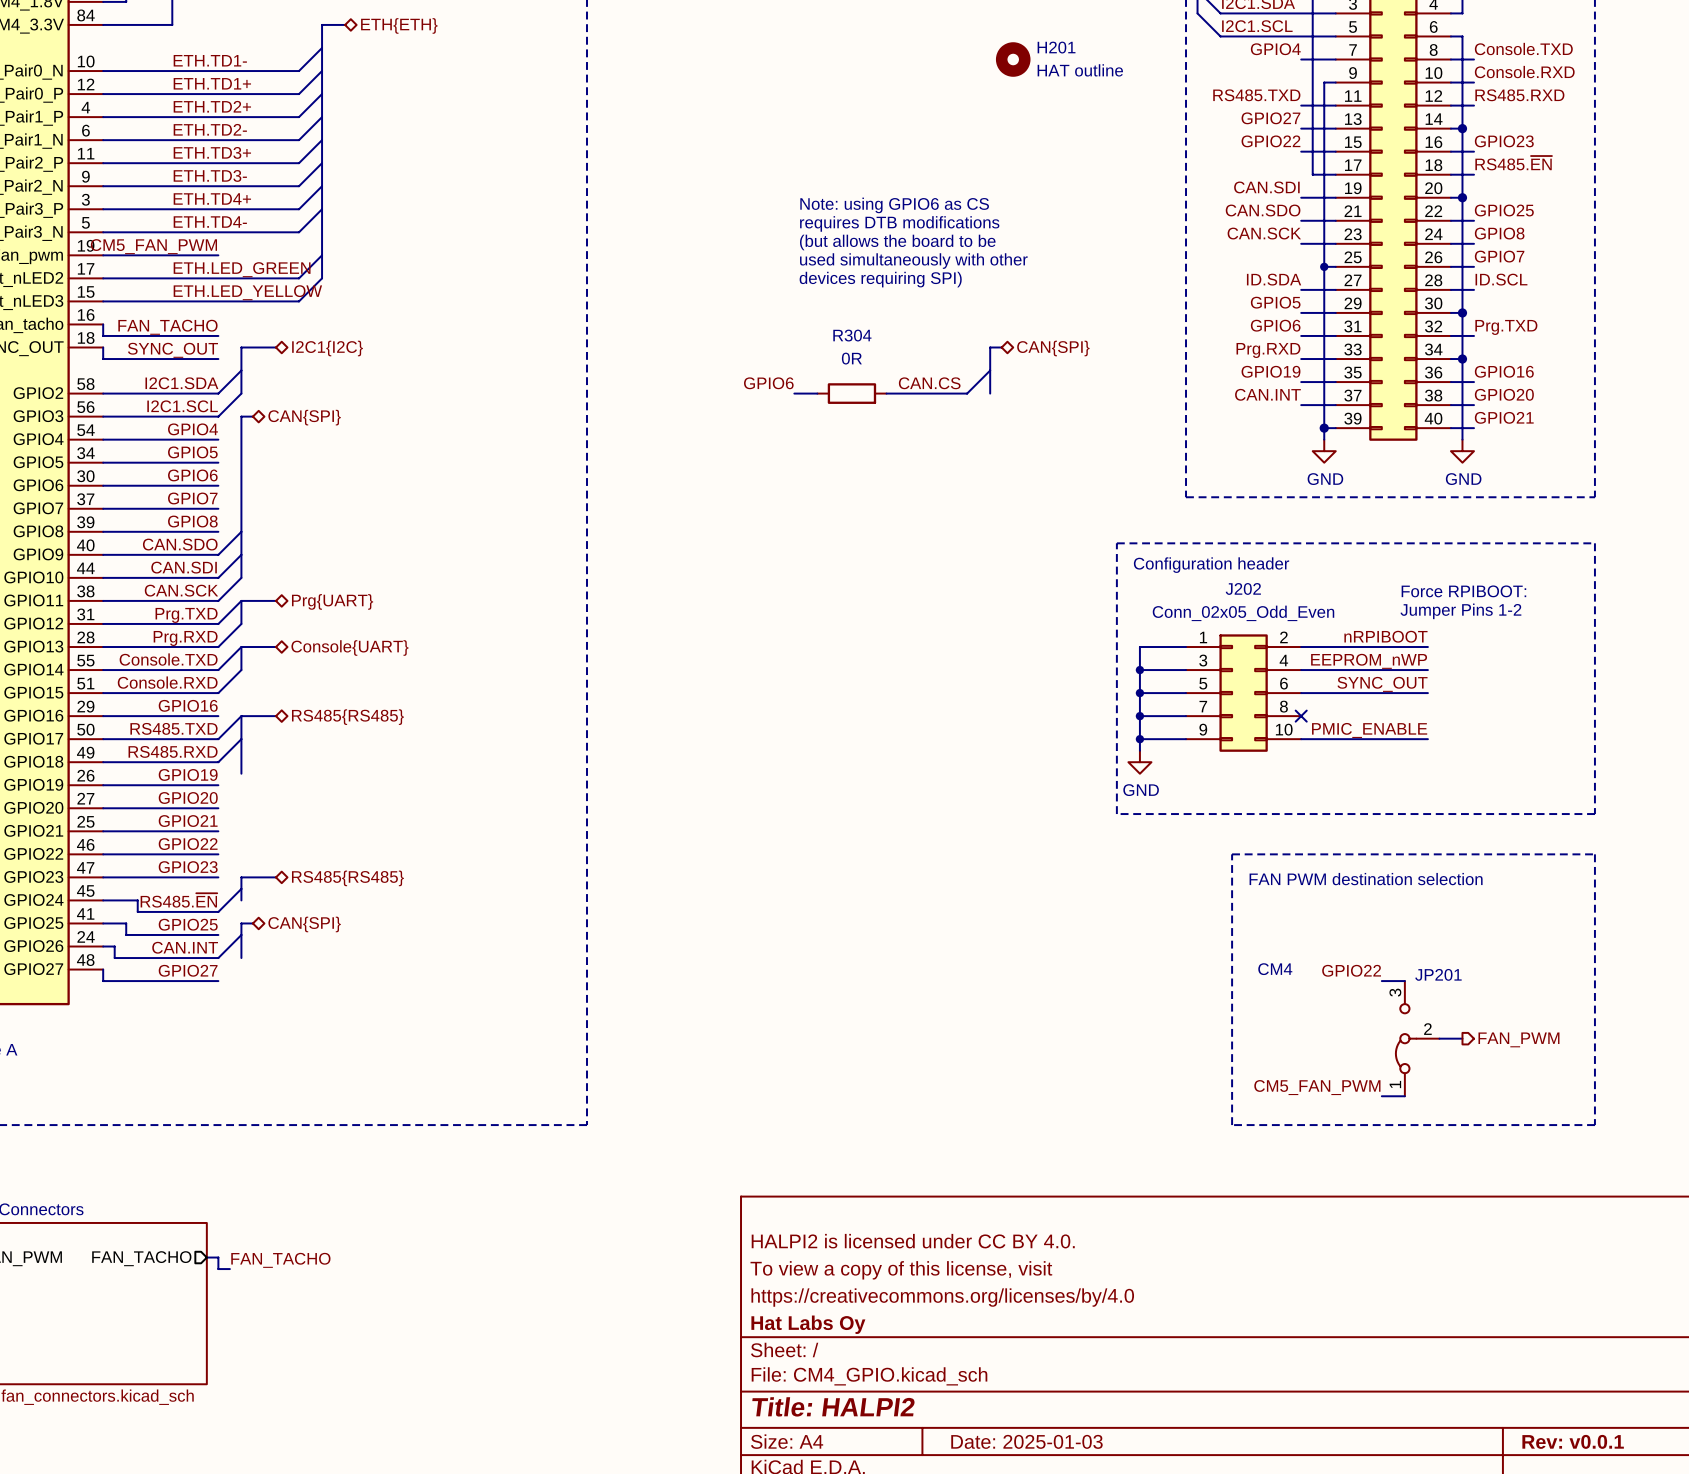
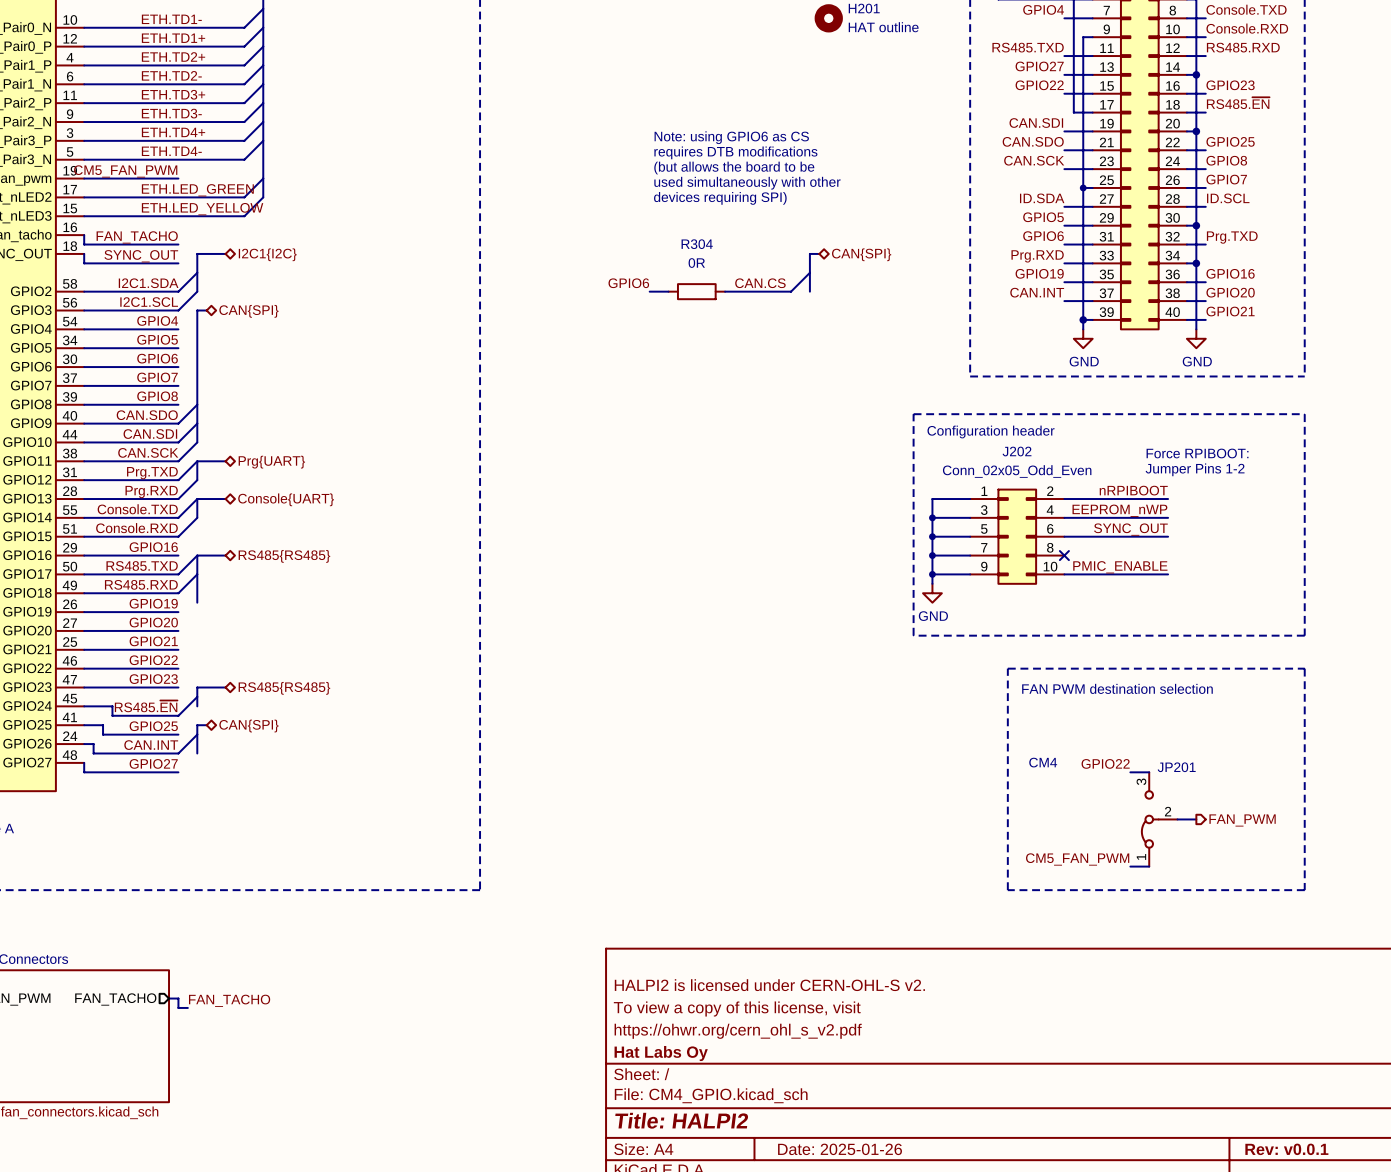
title block: HALPI2 is licensed under CC BY 4.0. (913, 1241) -> HALPI2 is licensed under CERN-OHL-S v2. (769, 985)
title block: https://creativecommons.org/licenses/by/4.0 (942, 1297) -> https://ohwr.org/cern_ohl_s_v2.pdf (738, 1031)
title block: Date: 2025-01-03 (1026, 1441) -> Date: 2025-01-26 (840, 1149)

